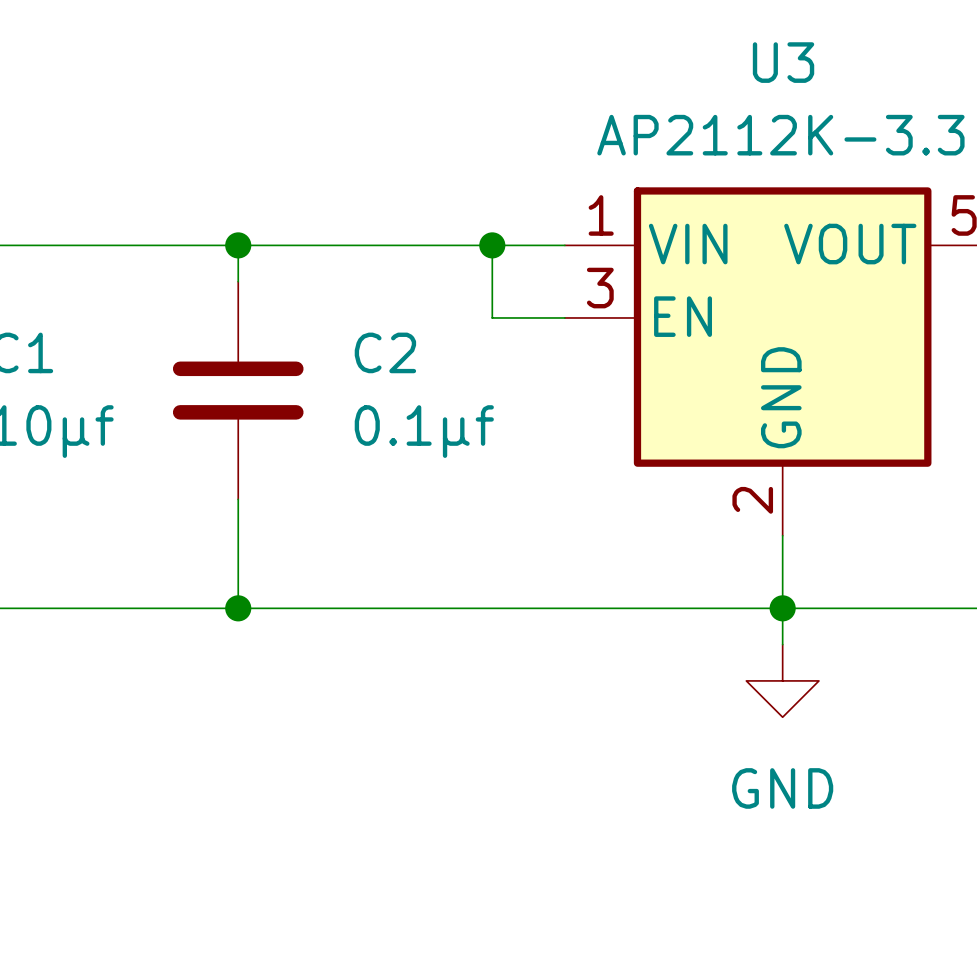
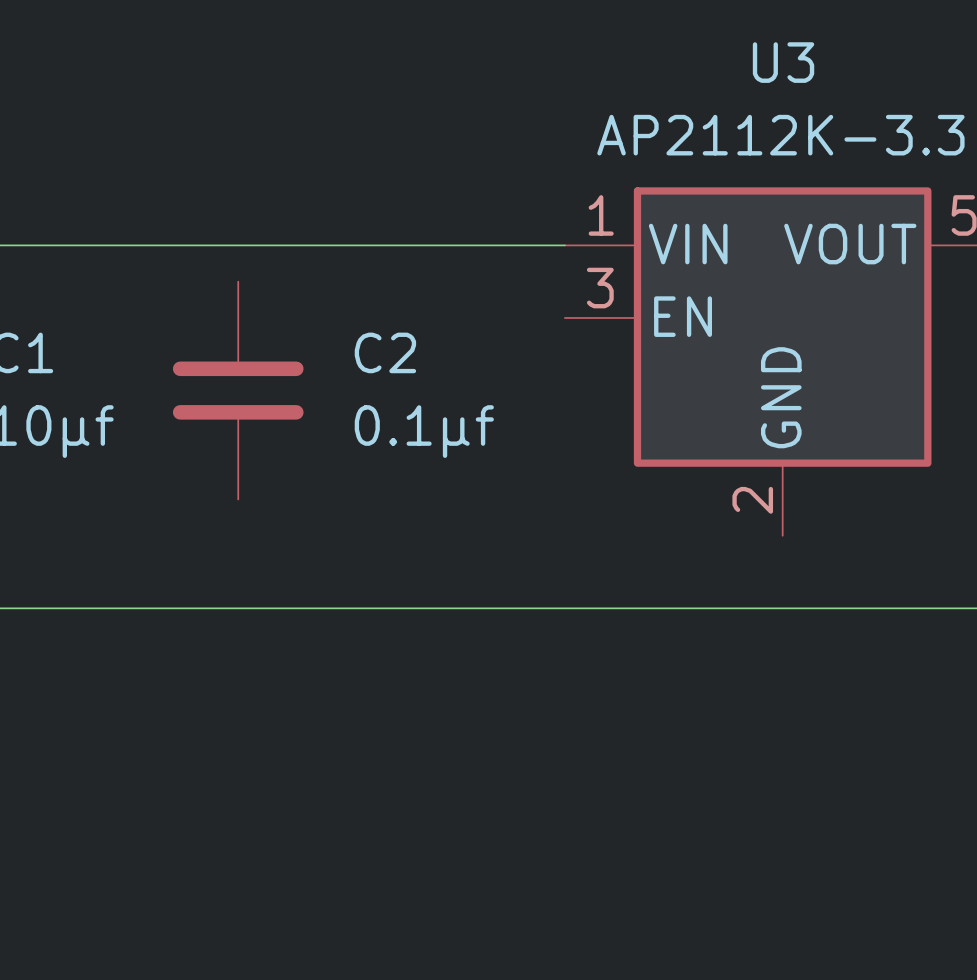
wire: (238, 245) (238, 281) -> none
junction: (238, 245) -> none
wire: (492, 245) (492, 317) (564, 317) -> none
junction: (492, 245) -> none
wire: (238, 499) (238, 608) -> none
wire: (782, 535) (782, 644) -> none
junction: (238, 608) -> none
junction: (782, 608) -> none
power symbol: GND (782, 680) -> none

